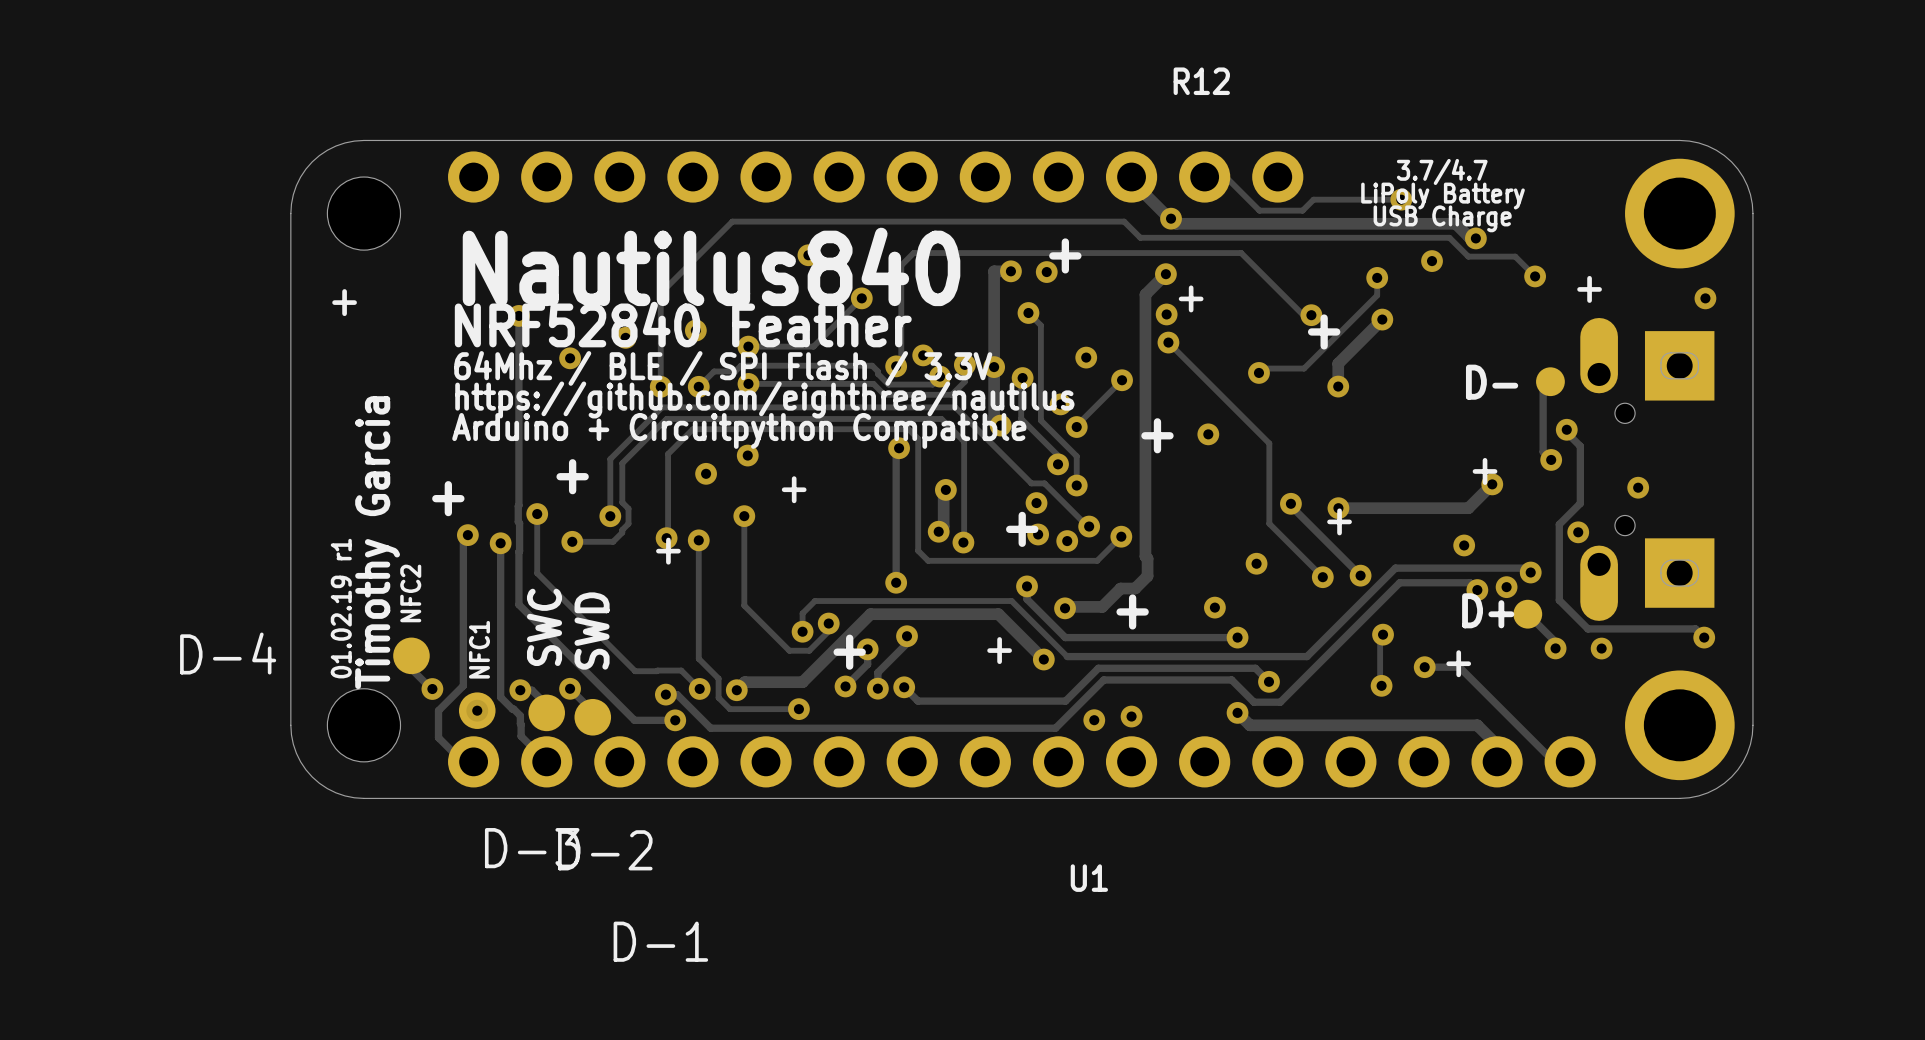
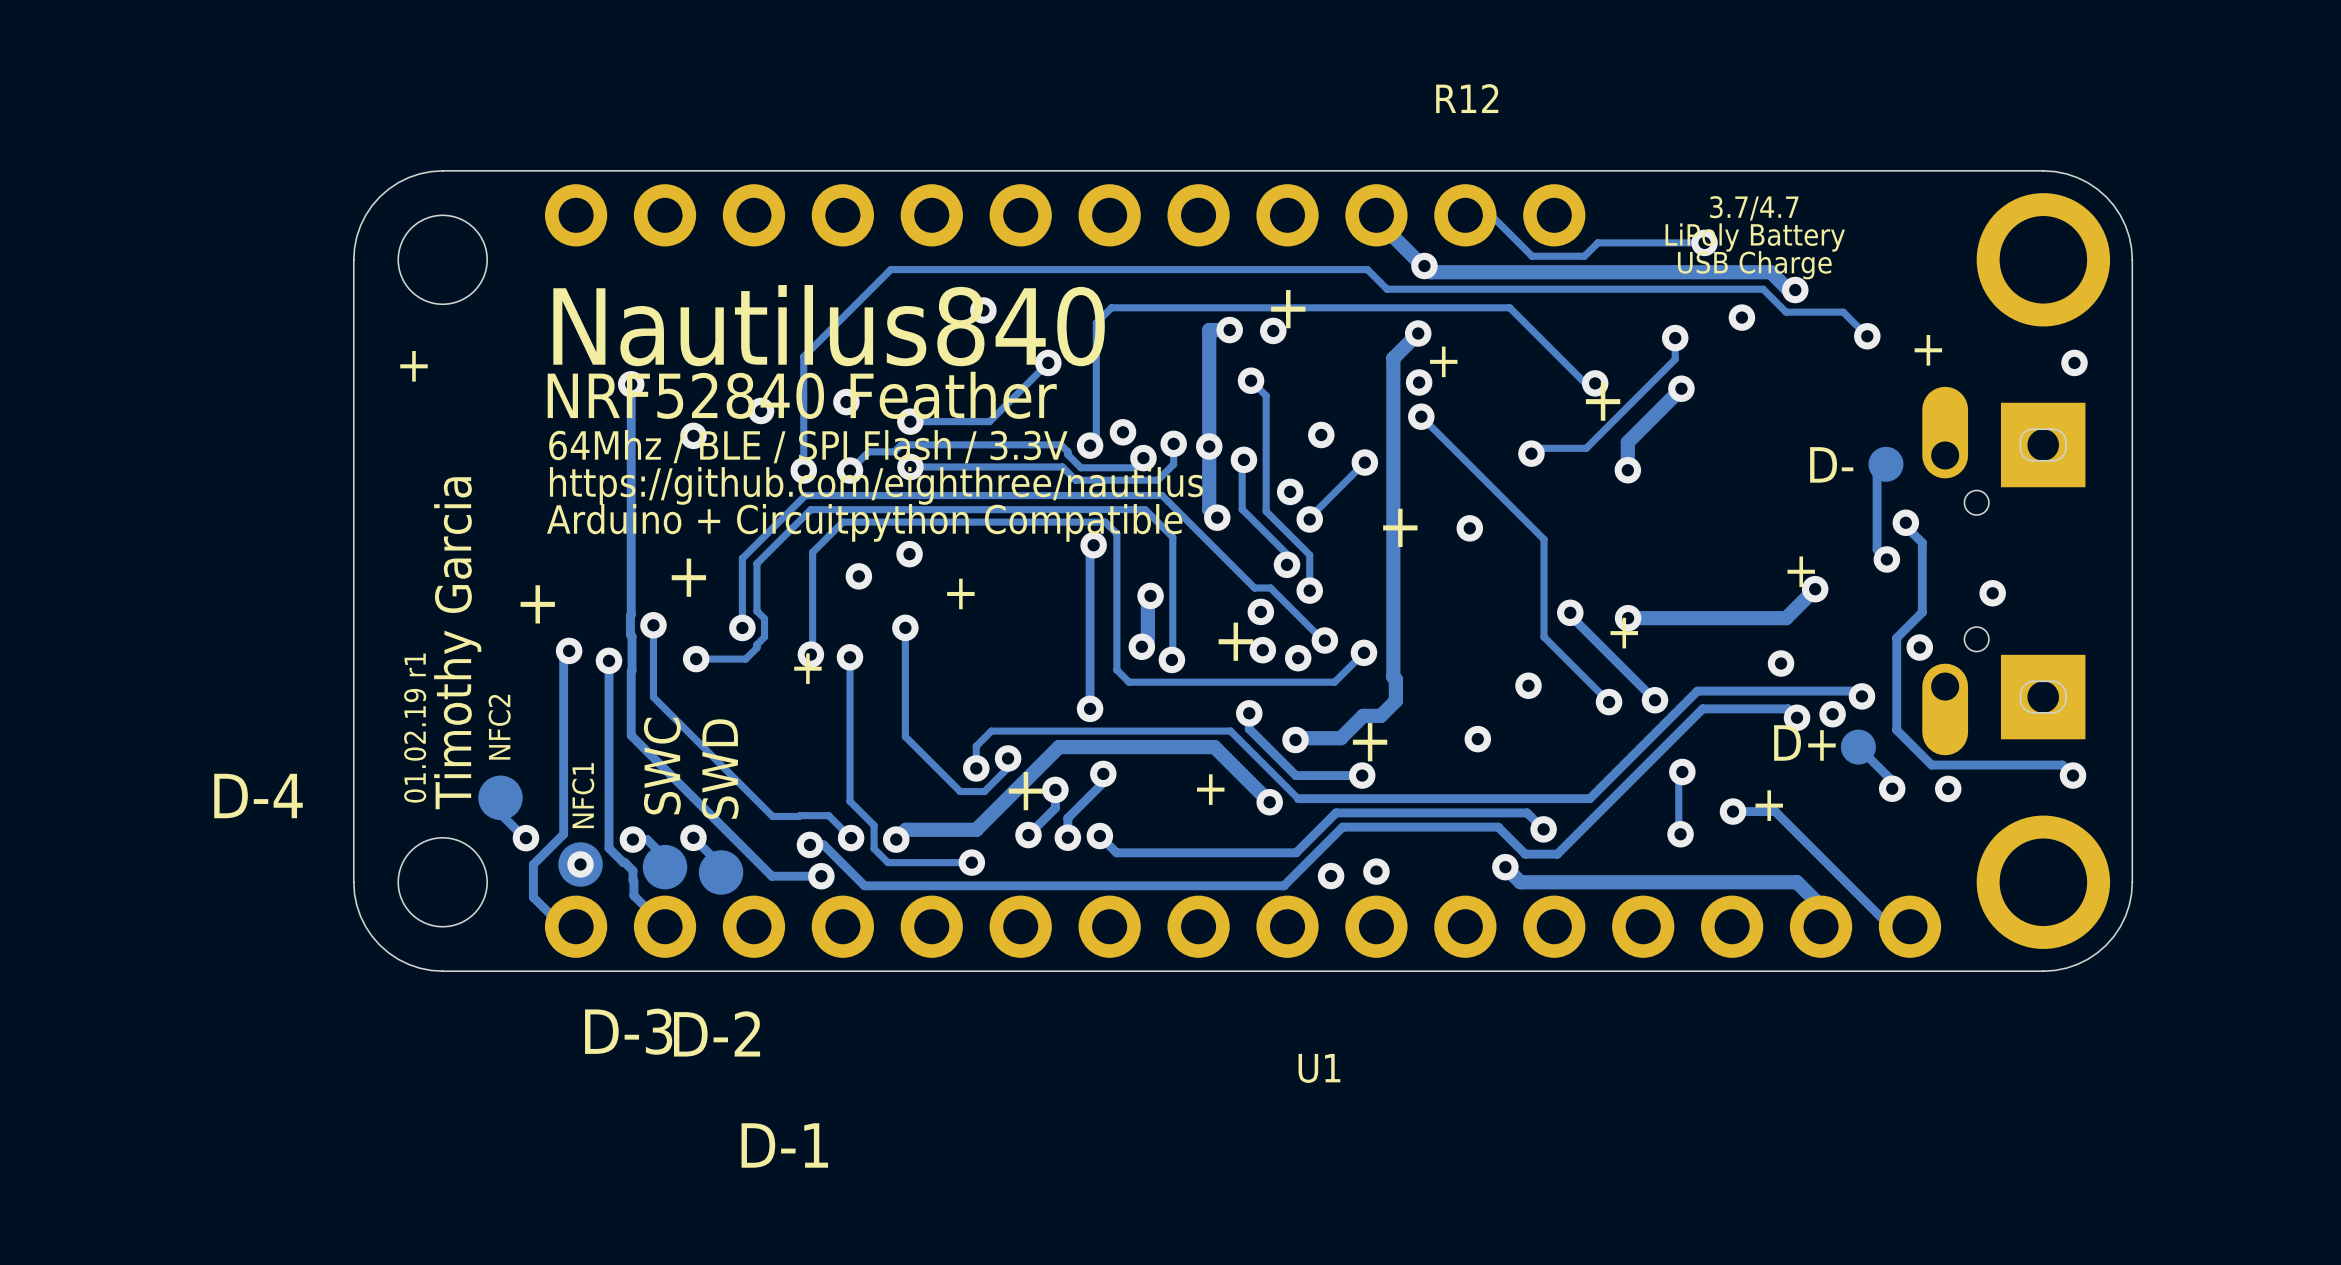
track: (1237, 637) (1119, 637) -> none
via position: (1237, 637) -> (1362, 775)

